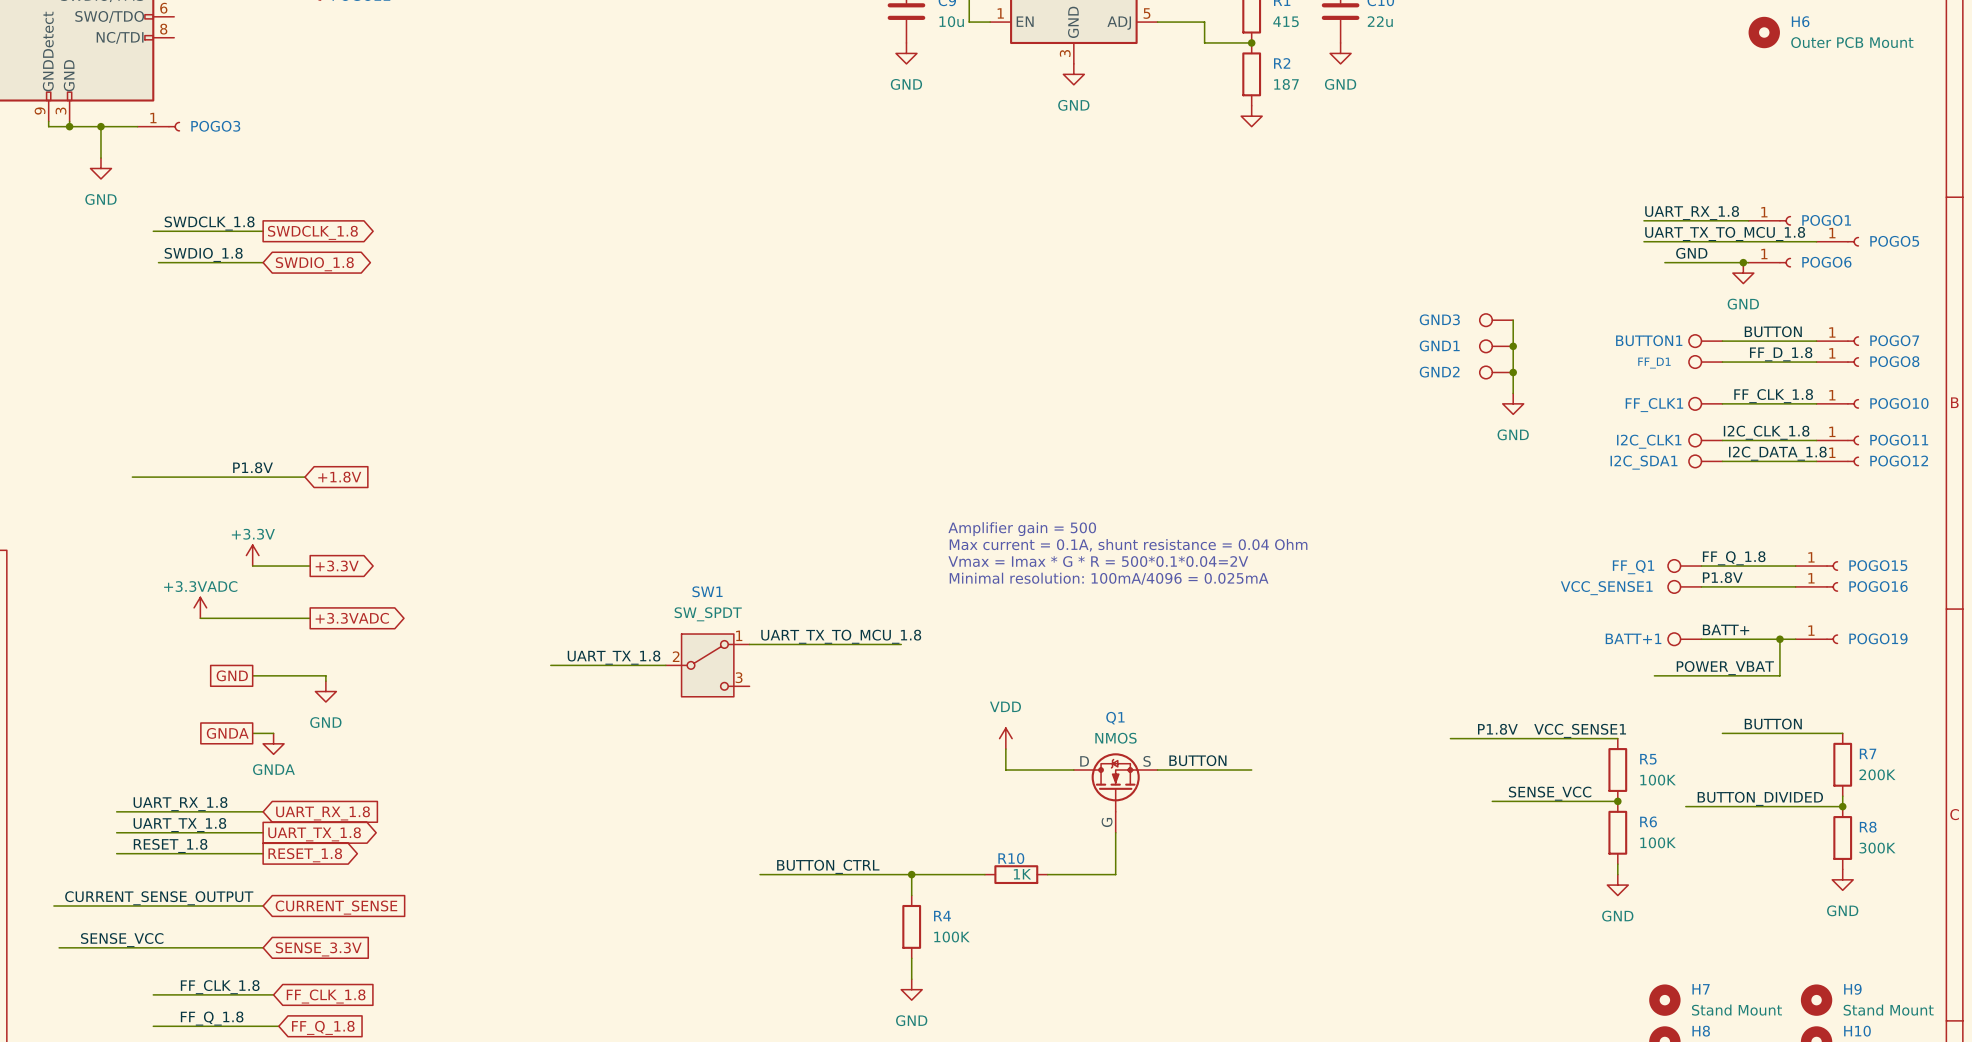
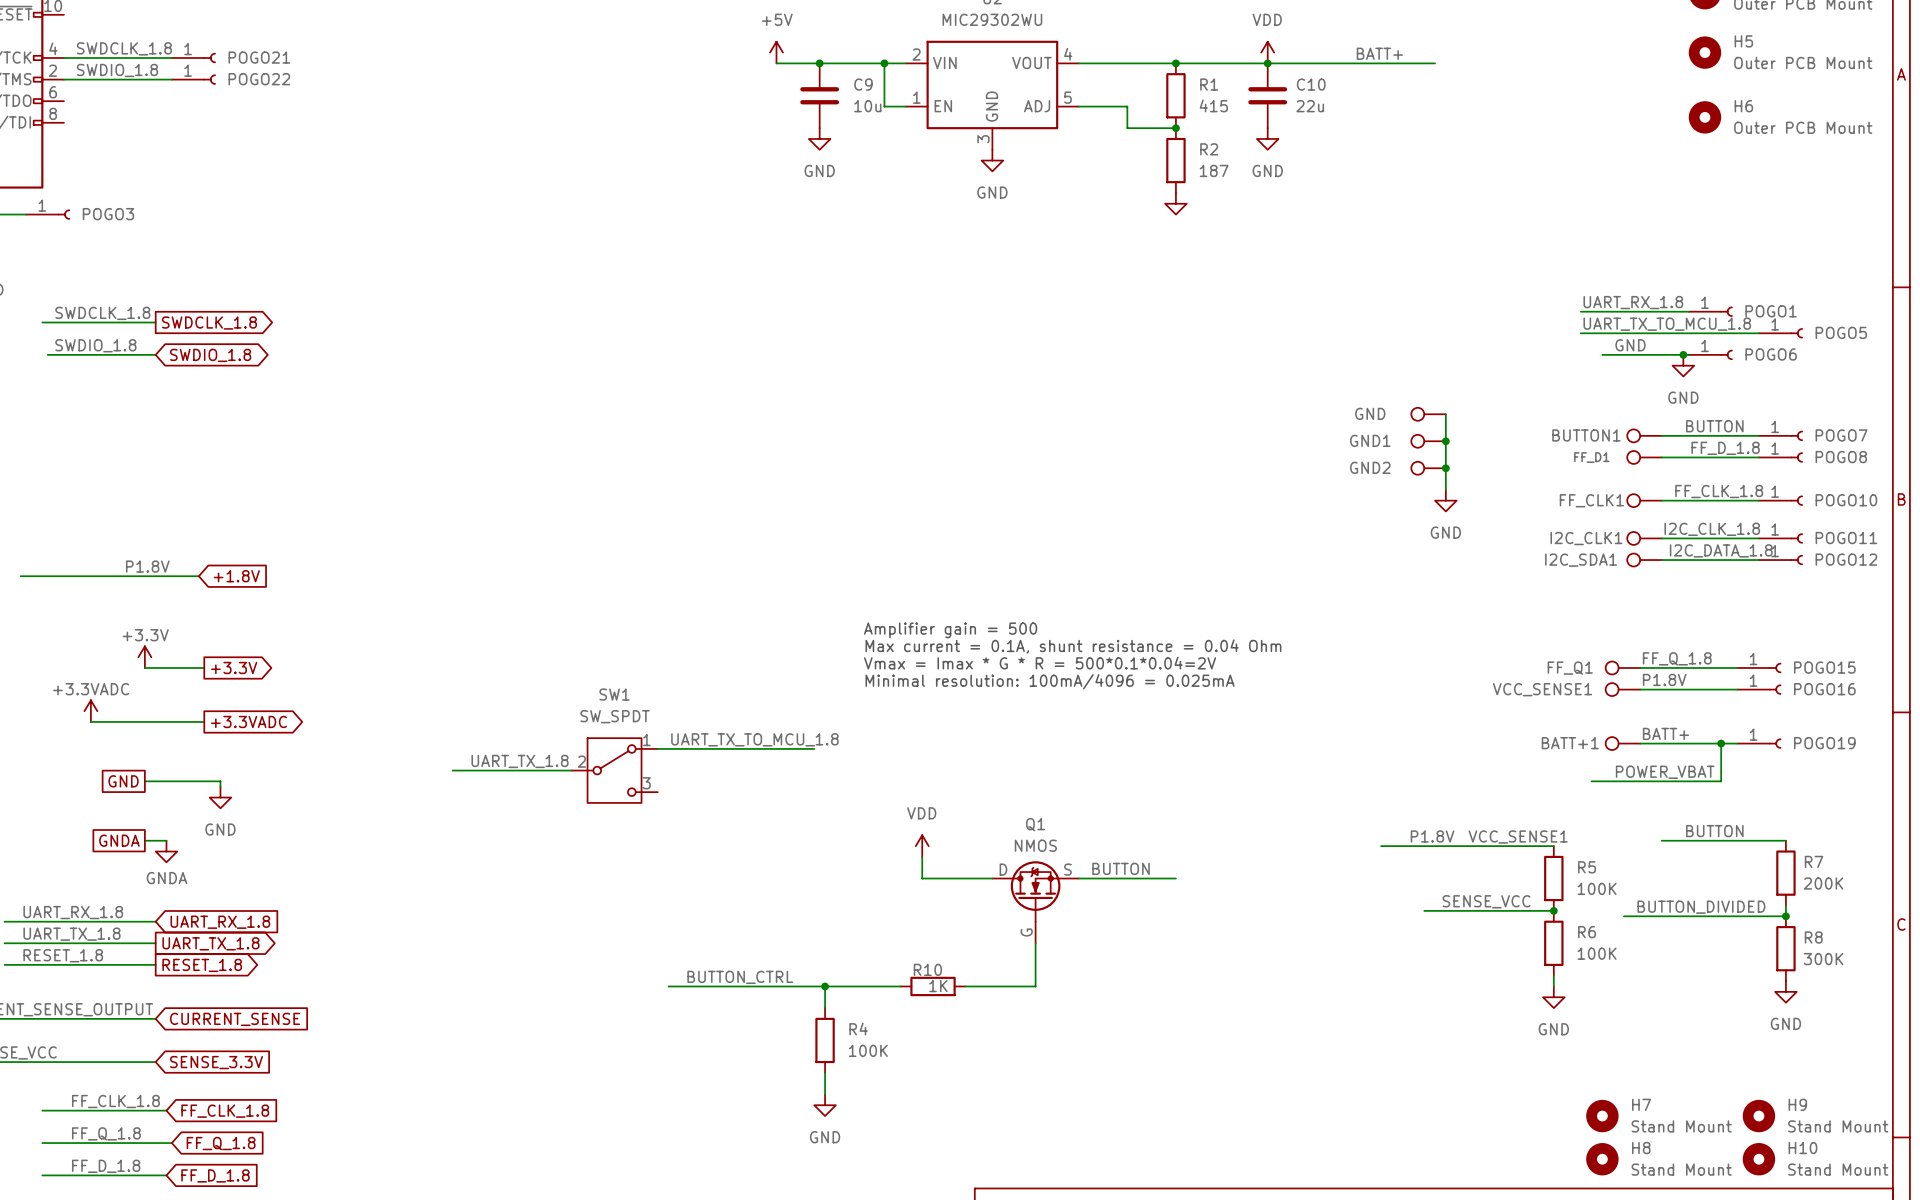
GND3 name: GND3 (1439, 319) -> GND (1370, 413)

